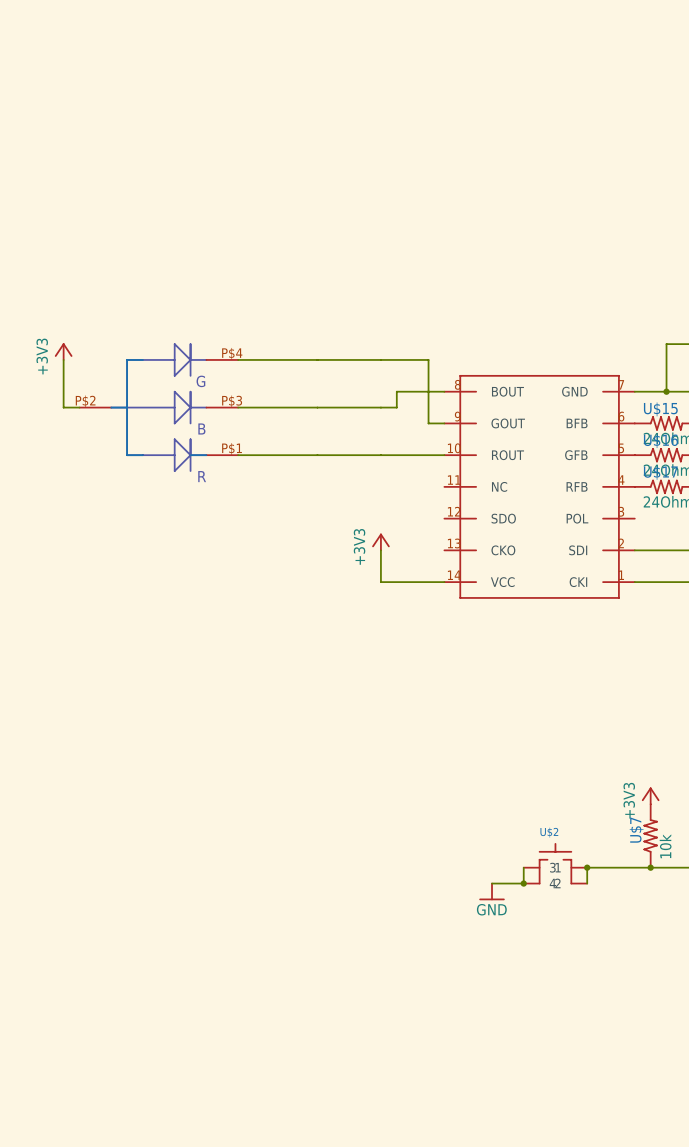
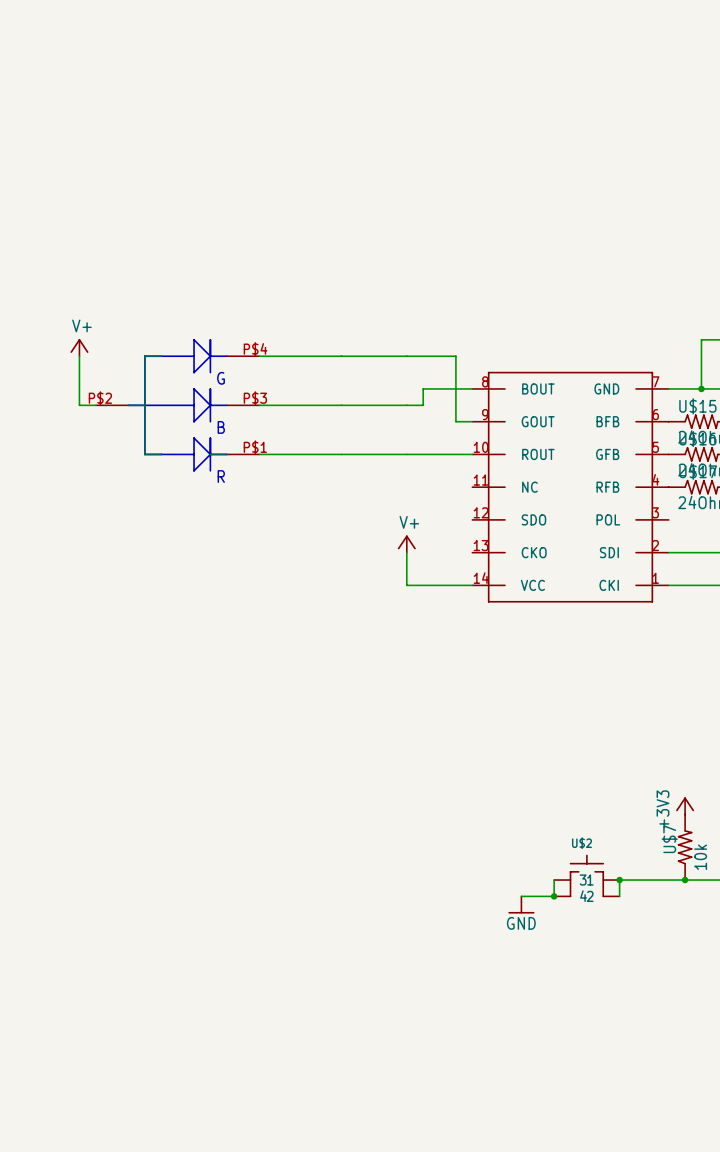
power symbol: +3V3 (63, 351) -> V+ (79, 347)
power symbol: +3V3 (380, 542) -> V+ (406, 544)

